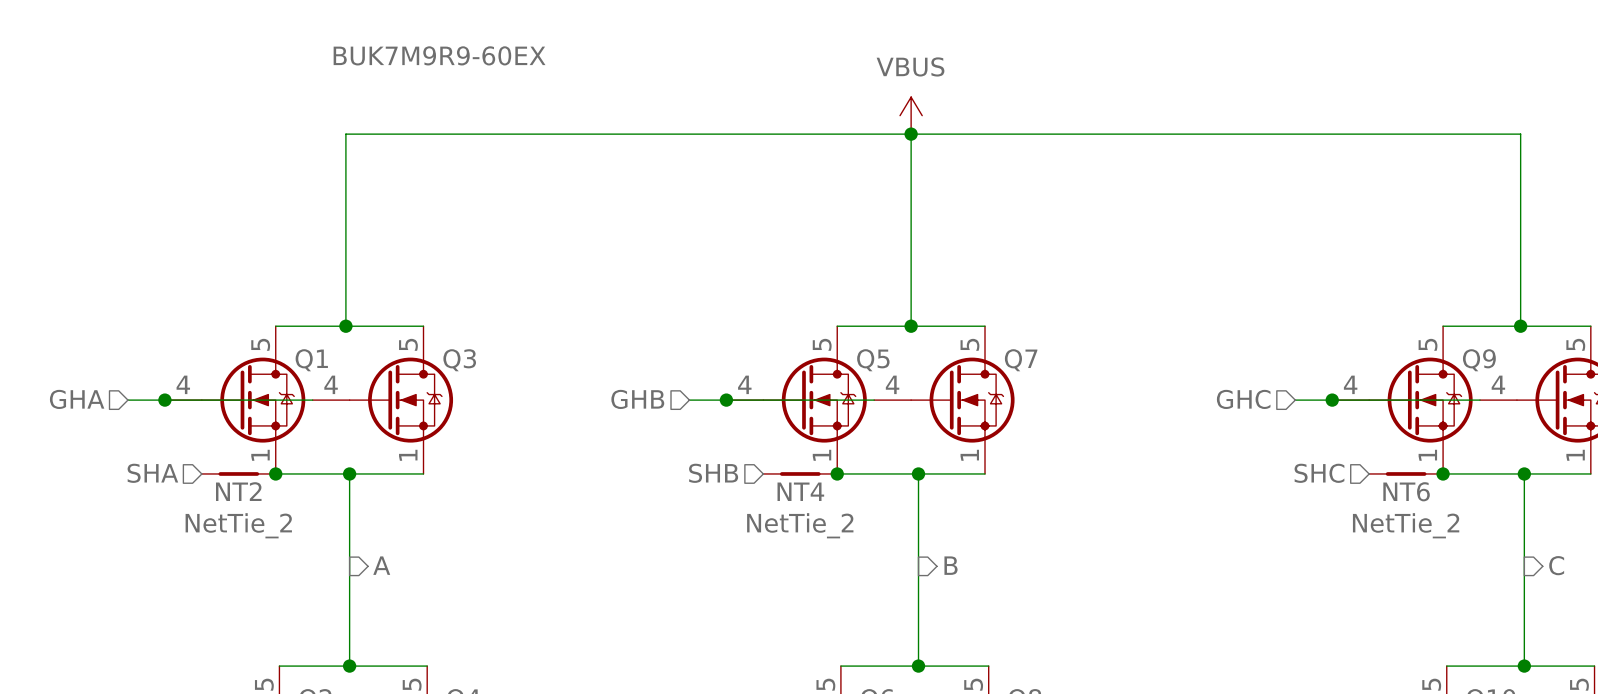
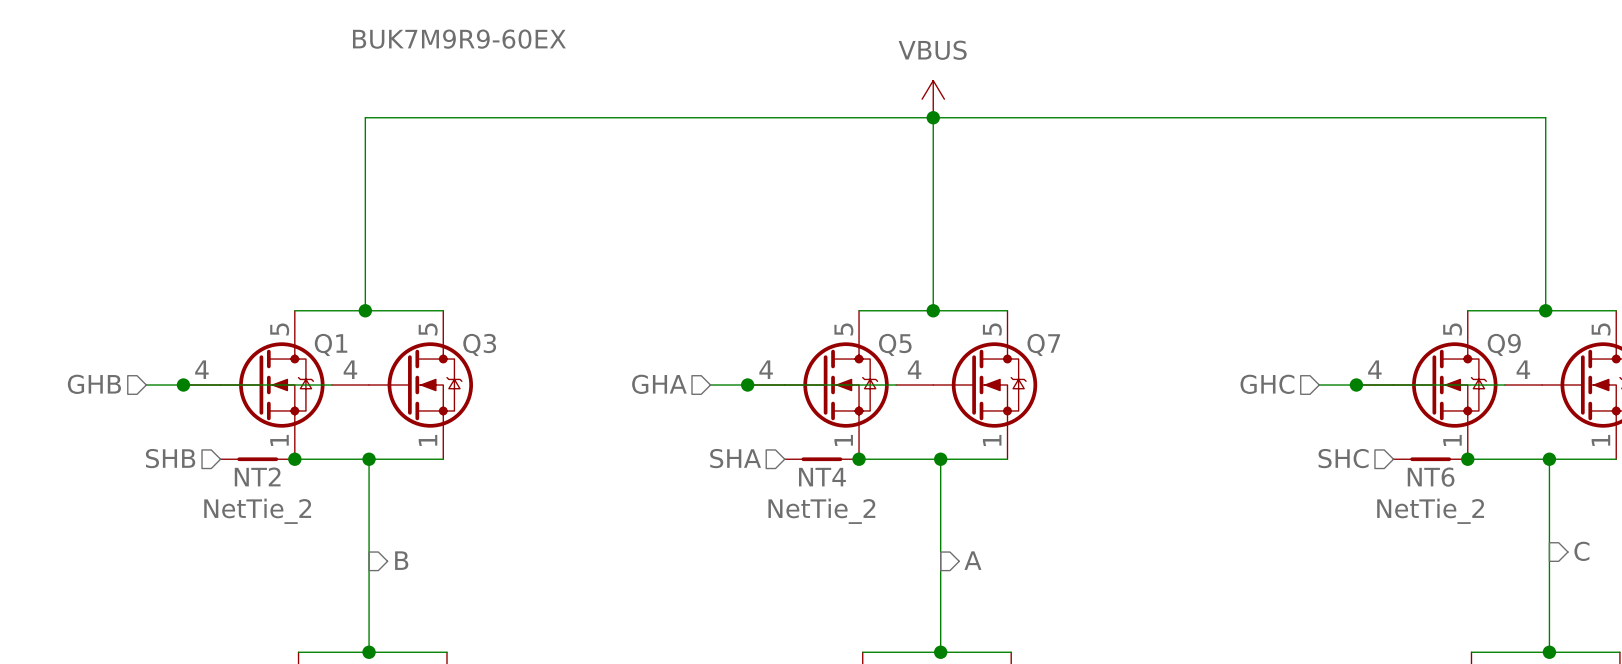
hierarchical label: GHA (77, 399) -> GHB (94, 384)
hierarchical label: GHB (637, 399) -> GHA (659, 384)
hierarchical label: SHA (152, 473) -> SHB (170, 458)
hierarchical label: SHB (713, 473) -> SHA (735, 458)
hierarchical label: A (381, 565) -> B (401, 560)
hierarchical label: B (951, 565) -> A (972, 560)

